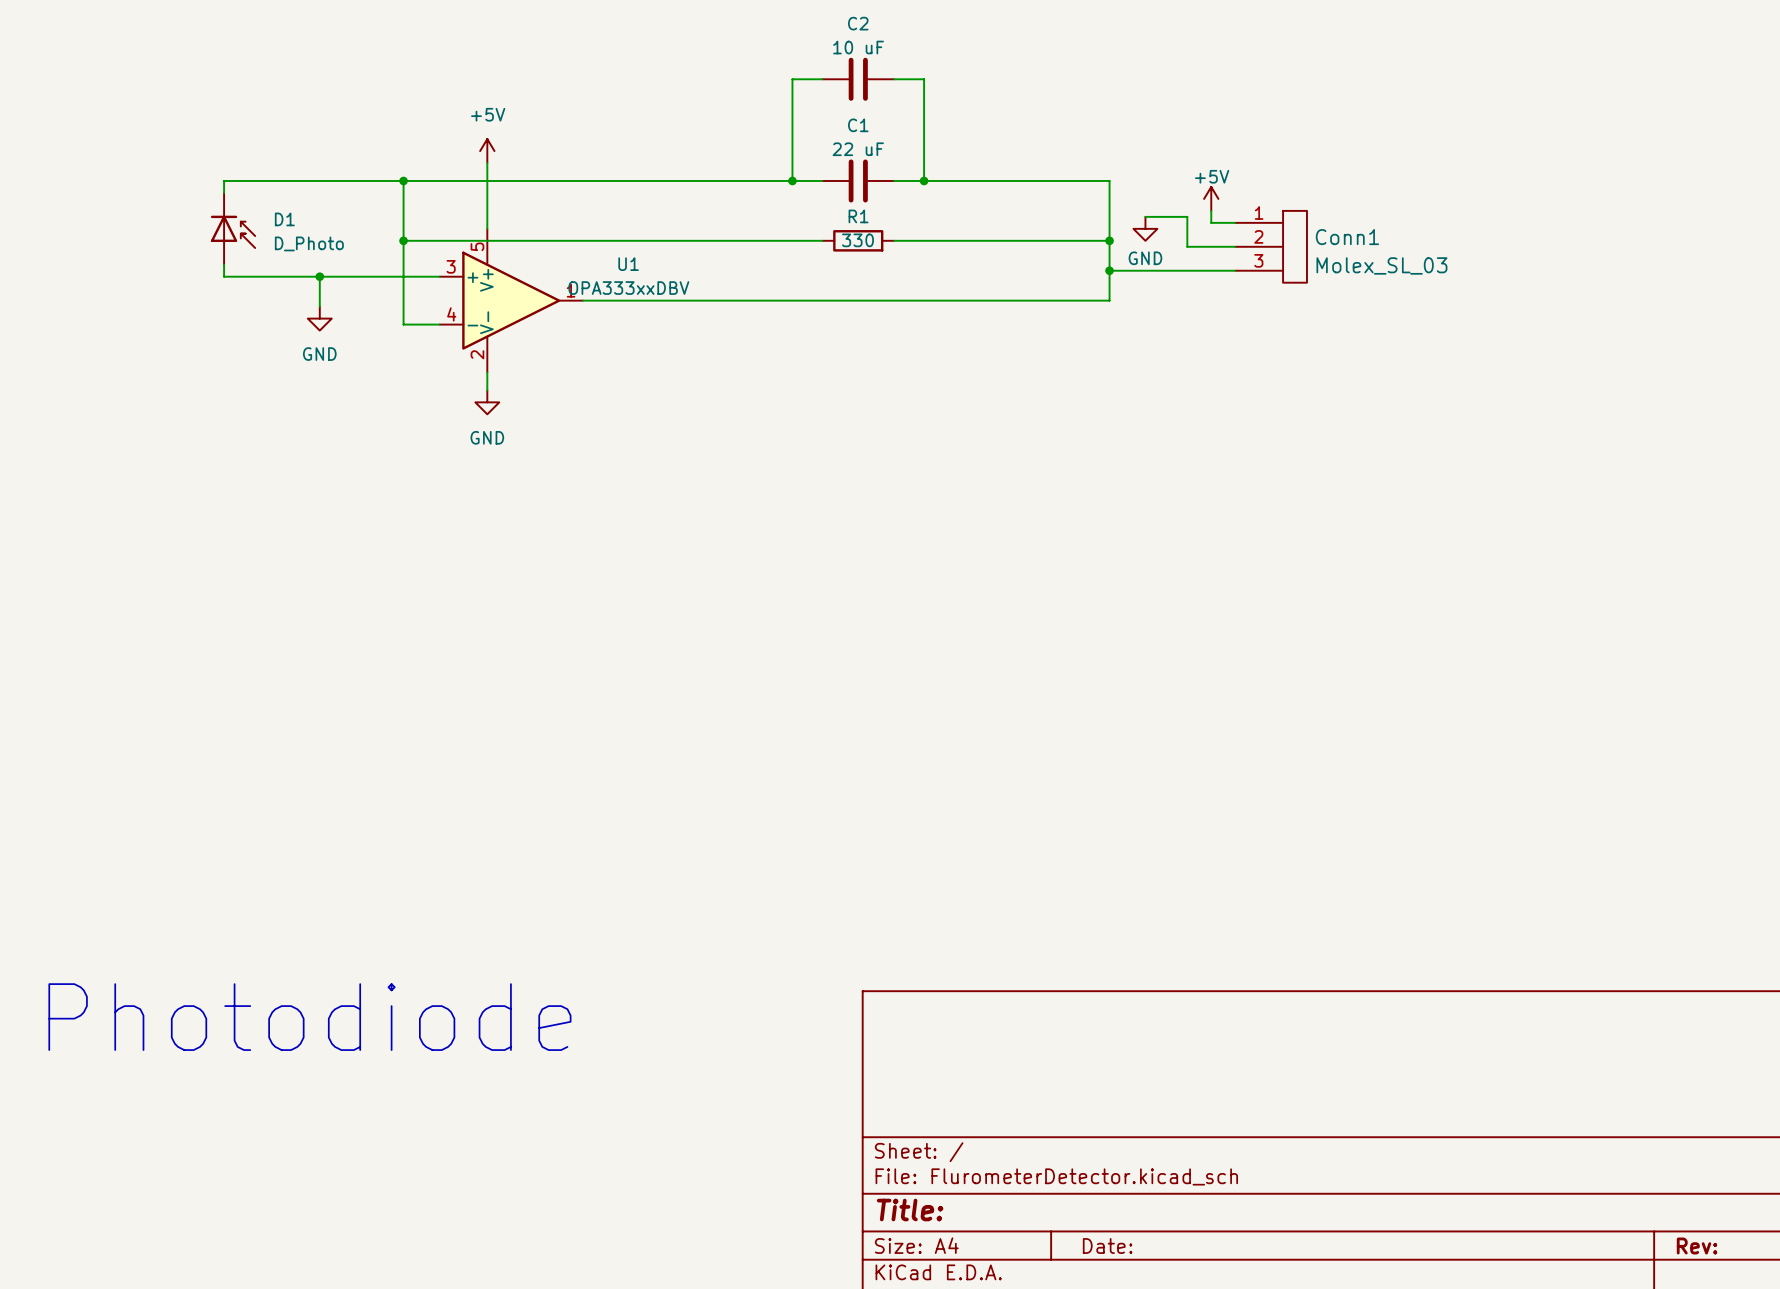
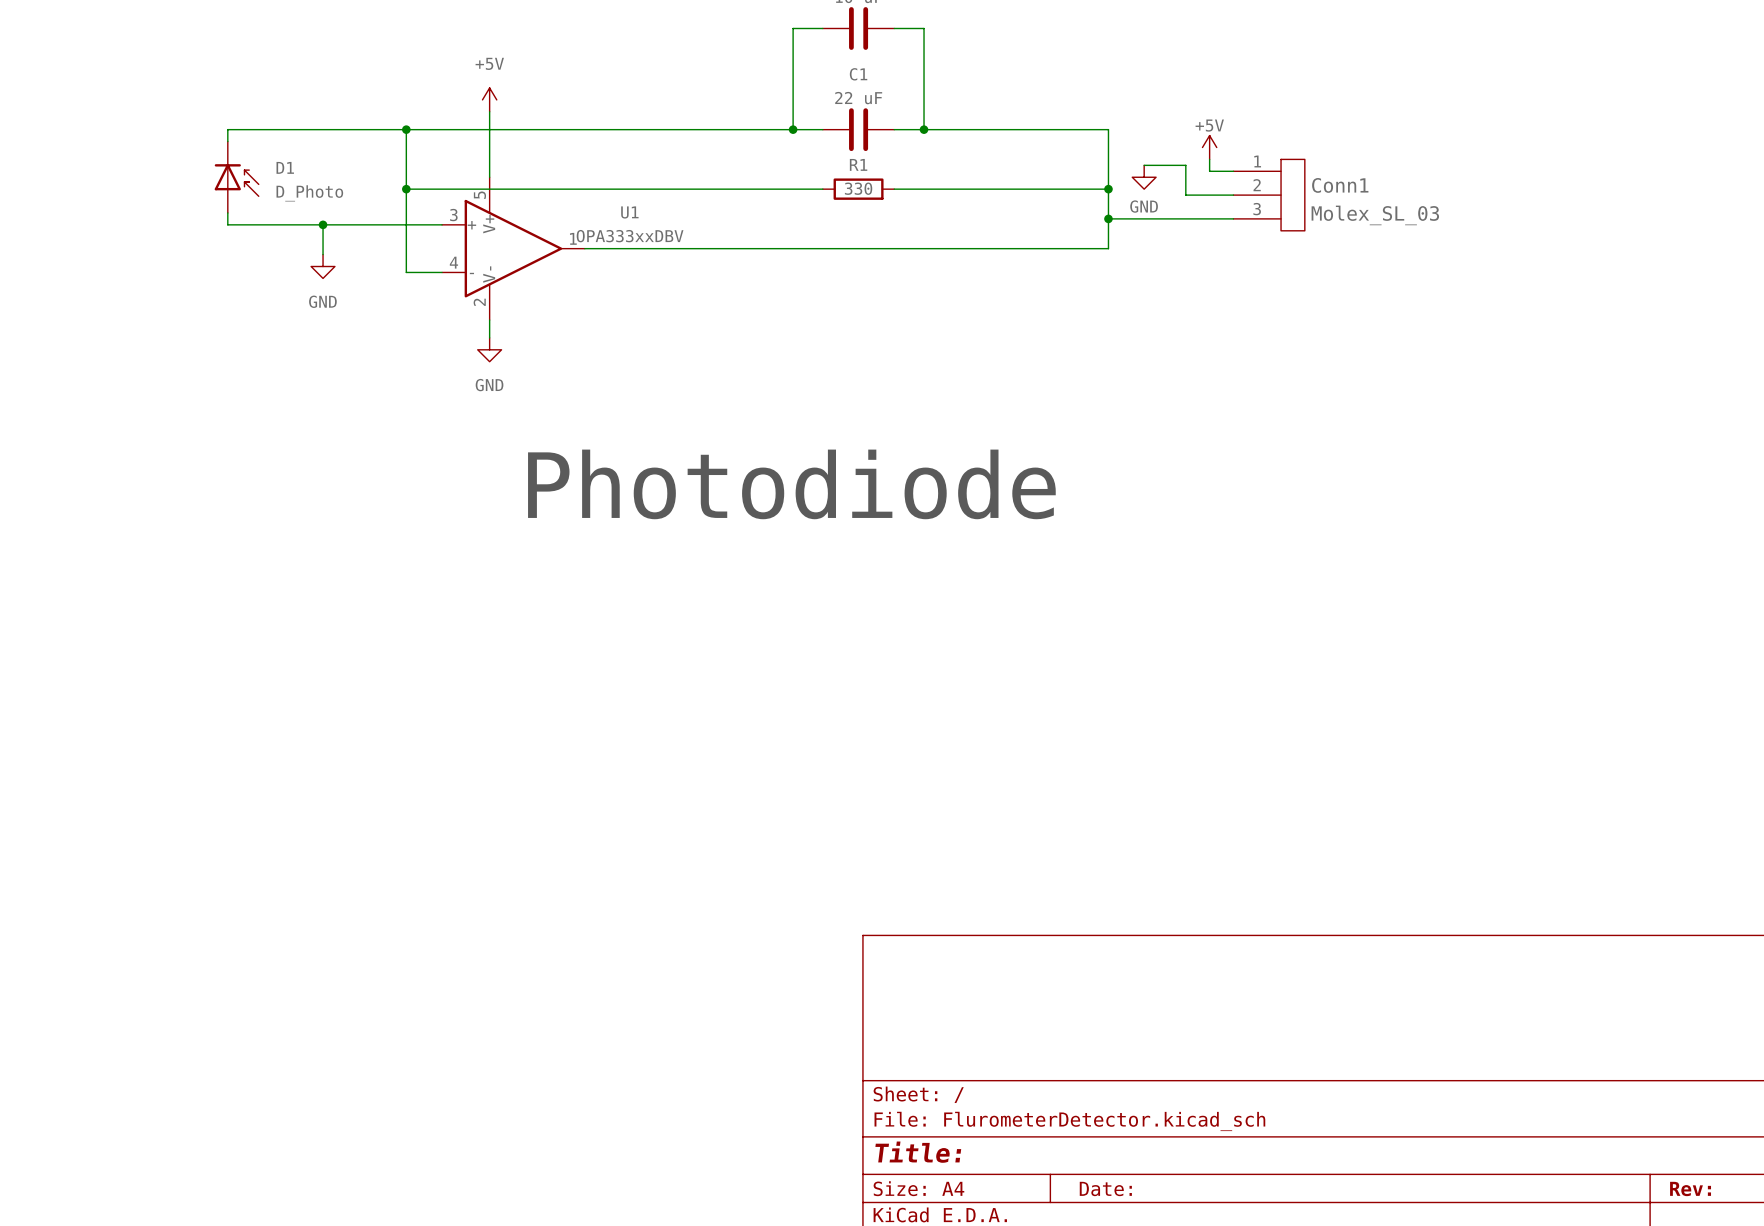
text: none -> Photodiode (791, 484)
text: Photodiode (309, 1017) -> none

